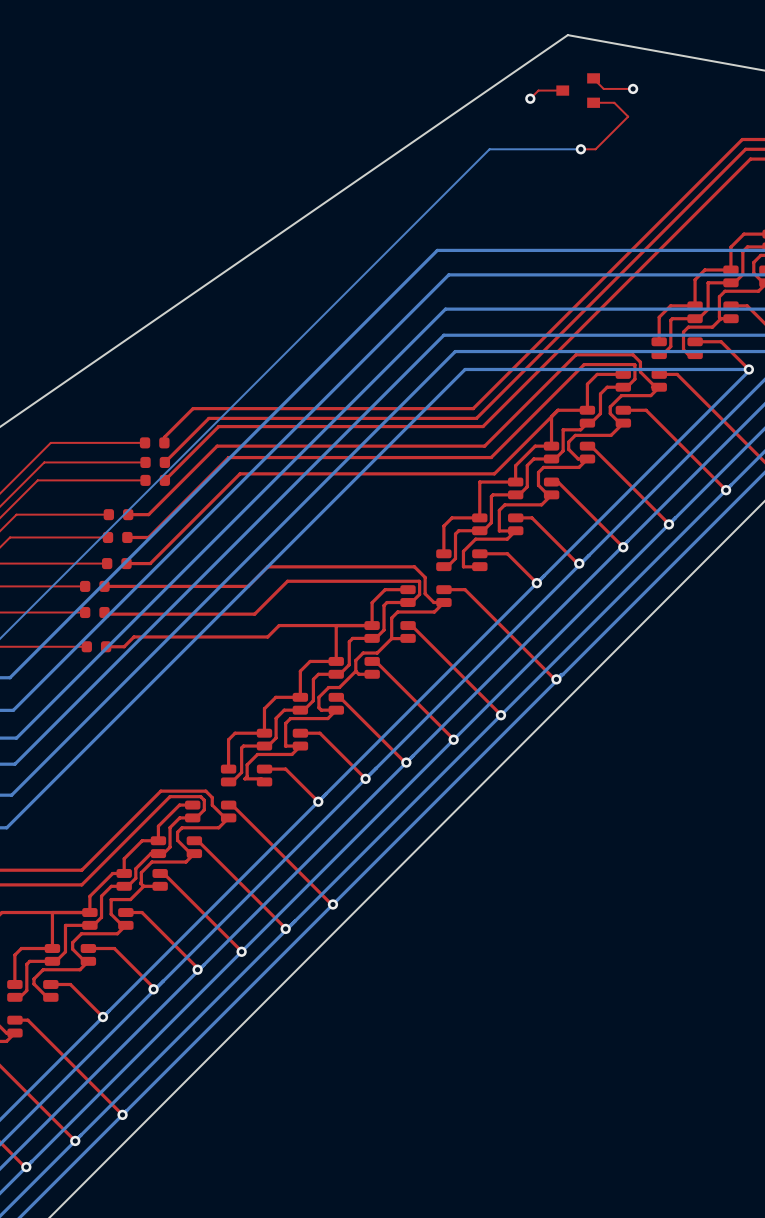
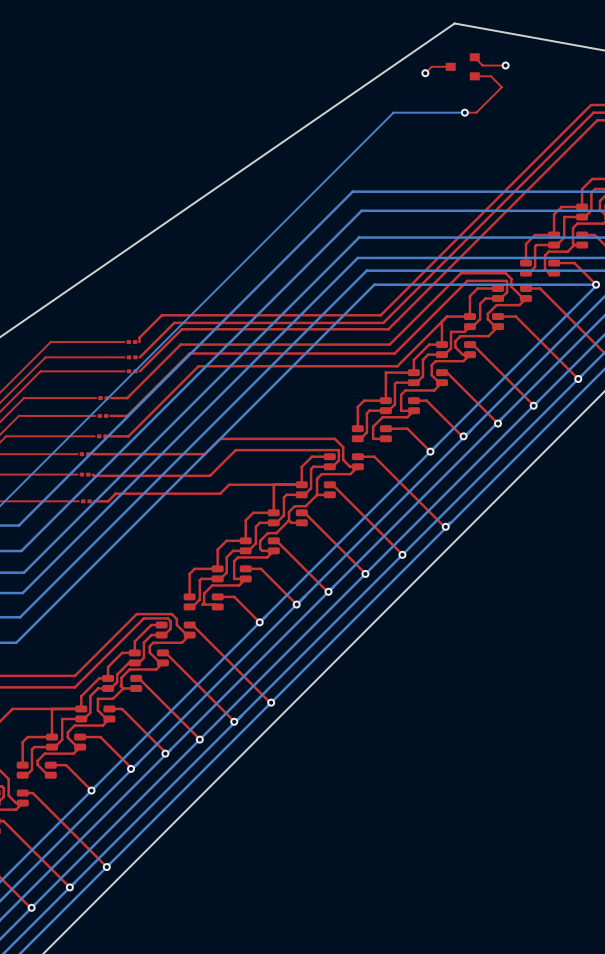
part footprint: [139, 437, 170, 449] -> [126, 340, 138, 345]
part footprint: [140, 456, 171, 469] -> [126, 355, 138, 360]
part footprint: [140, 474, 171, 486] -> [126, 369, 138, 374]
part footprint: [103, 509, 134, 521] -> [98, 396, 110, 401]
part footprint: [102, 531, 133, 544] -> [97, 413, 109, 418]
part footprint: [101, 558, 132, 570] -> [96, 434, 108, 439]
part footprint: [79, 580, 110, 592] -> [79, 452, 91, 457]
part footprint: [79, 606, 110, 619] -> [79, 472, 91, 477]
part footprint: [81, 641, 112, 653] -> [80, 499, 92, 504]

